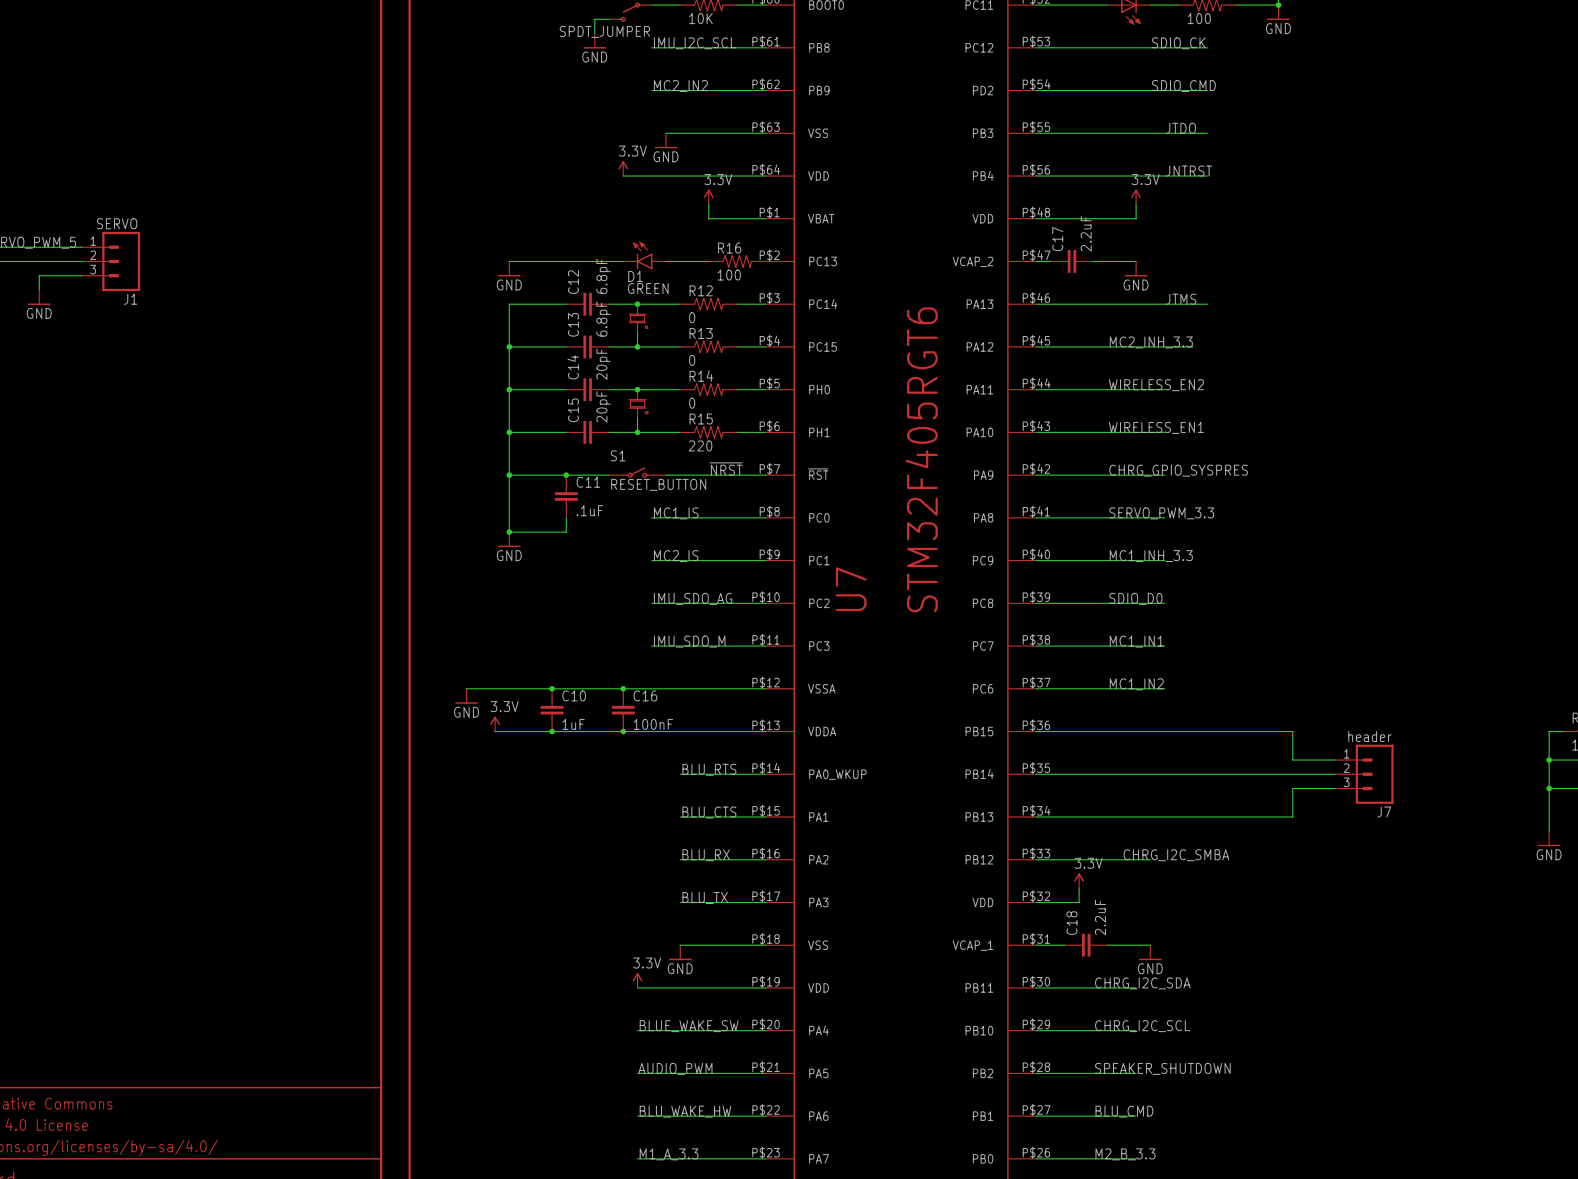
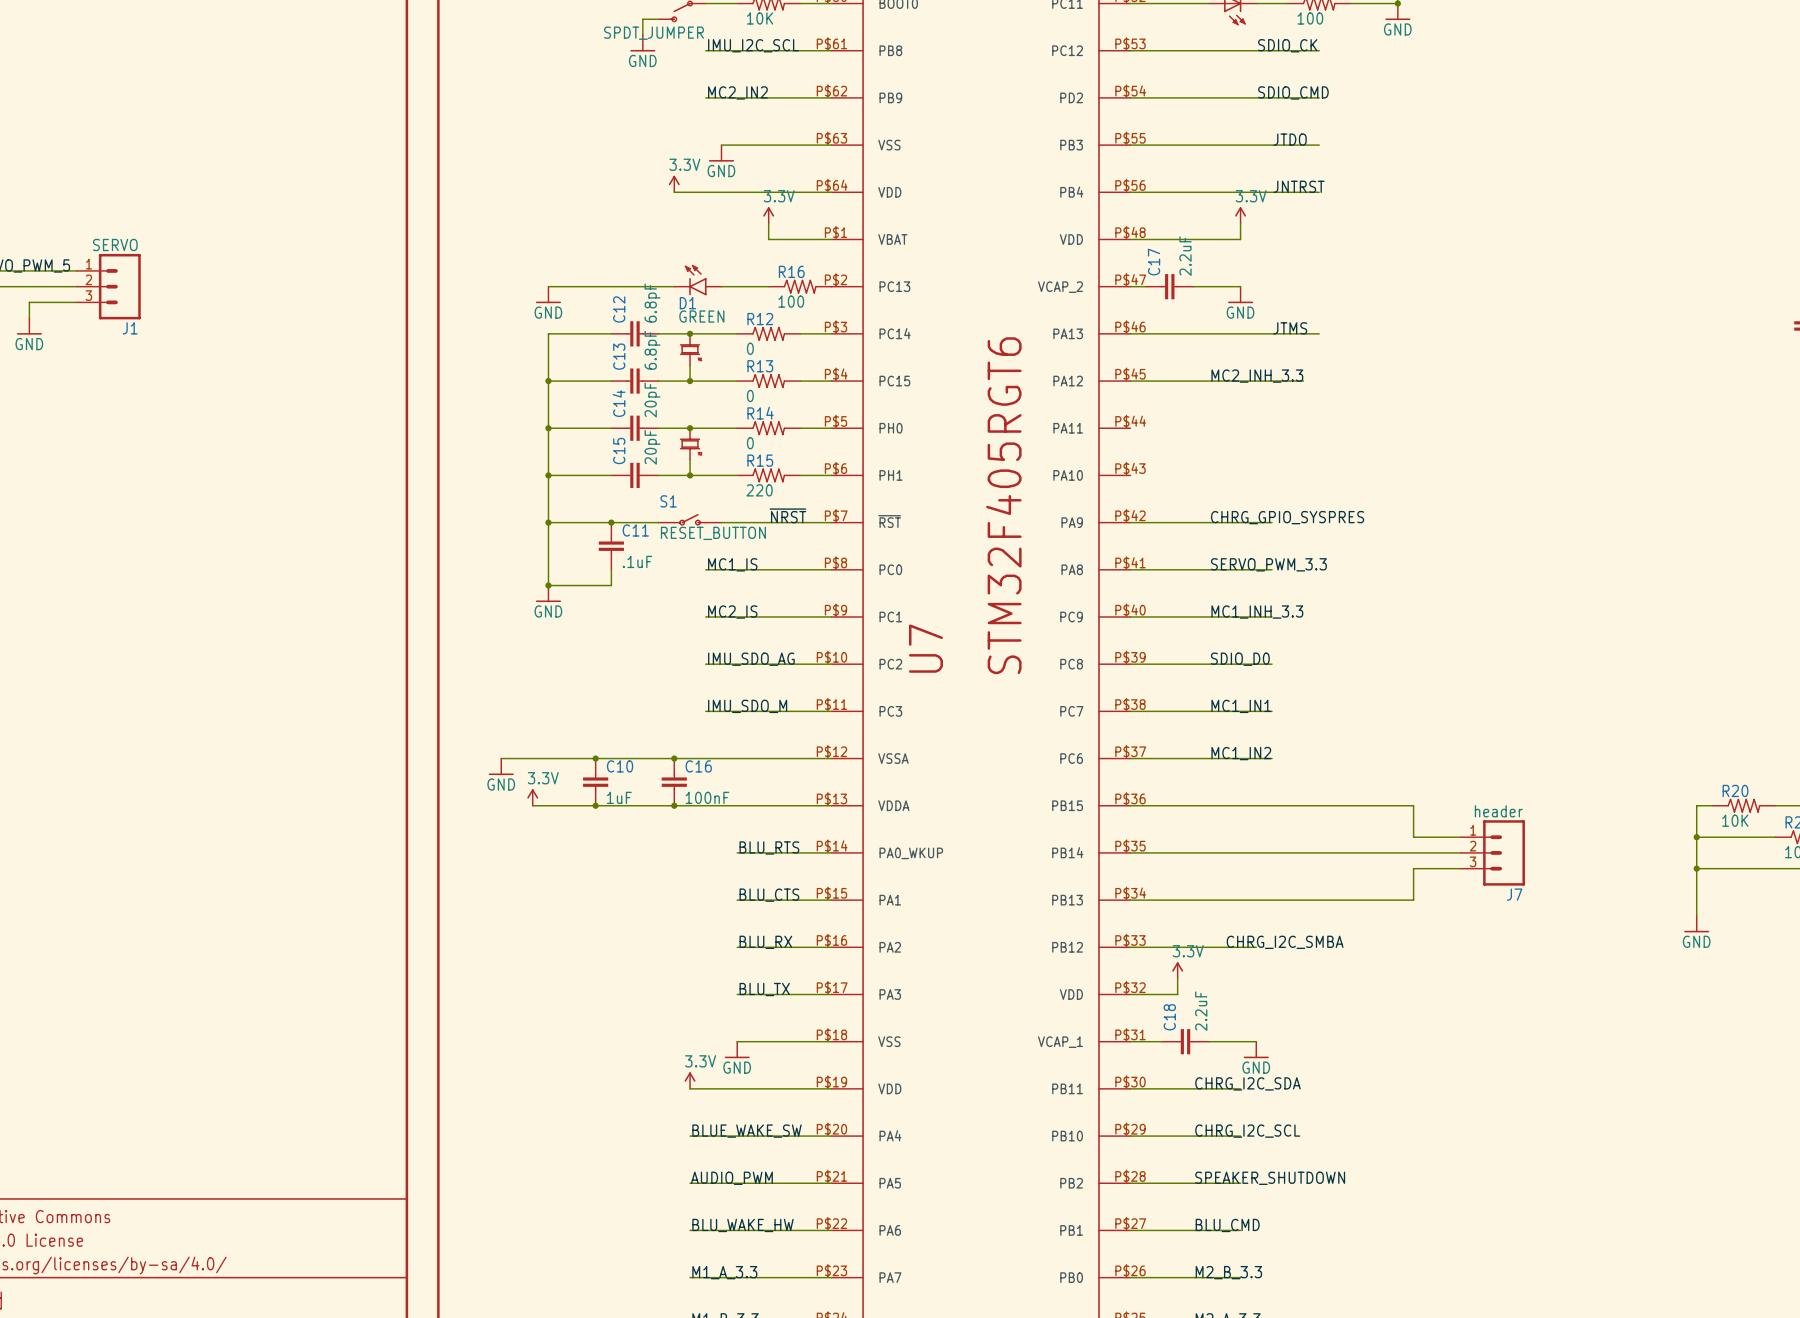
label: WIRELESS_EN2 (1156, 385) -> none
wire: (1036, 389) (1164, 389) -> none
label: WIRELESS_EN1 (1156, 427) -> none
wire: (1036, 432) (1164, 432) -> none

